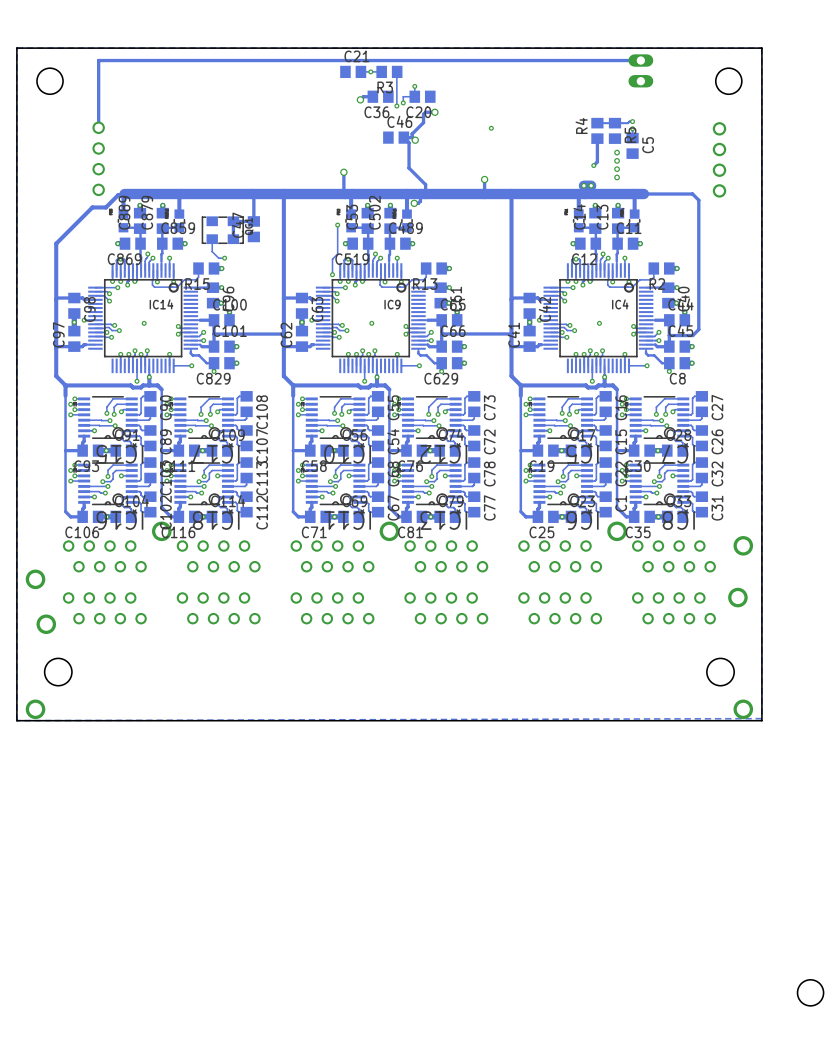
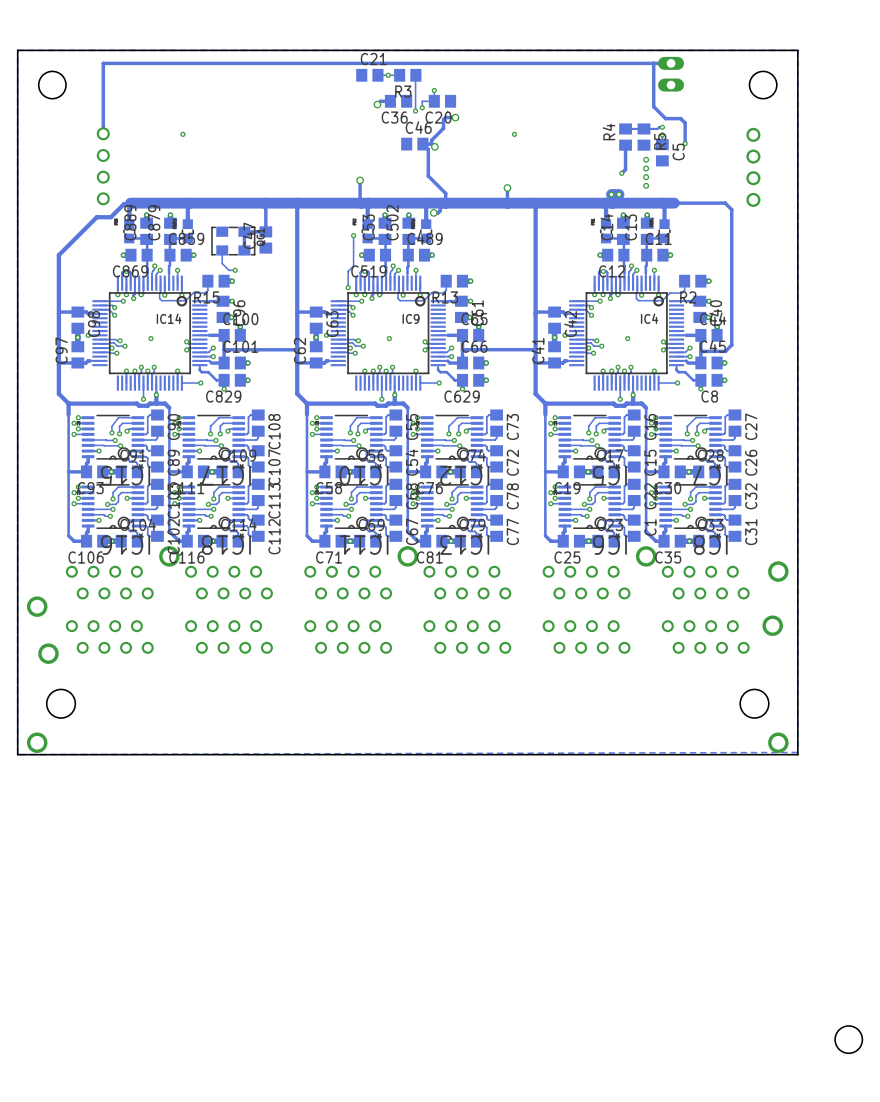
track: none -> (653, 63) (653, 106) (665, 118) (680, 118) (685, 122) (685, 143)
via: none -> (182, 134)
via: none -> (685, 143)

